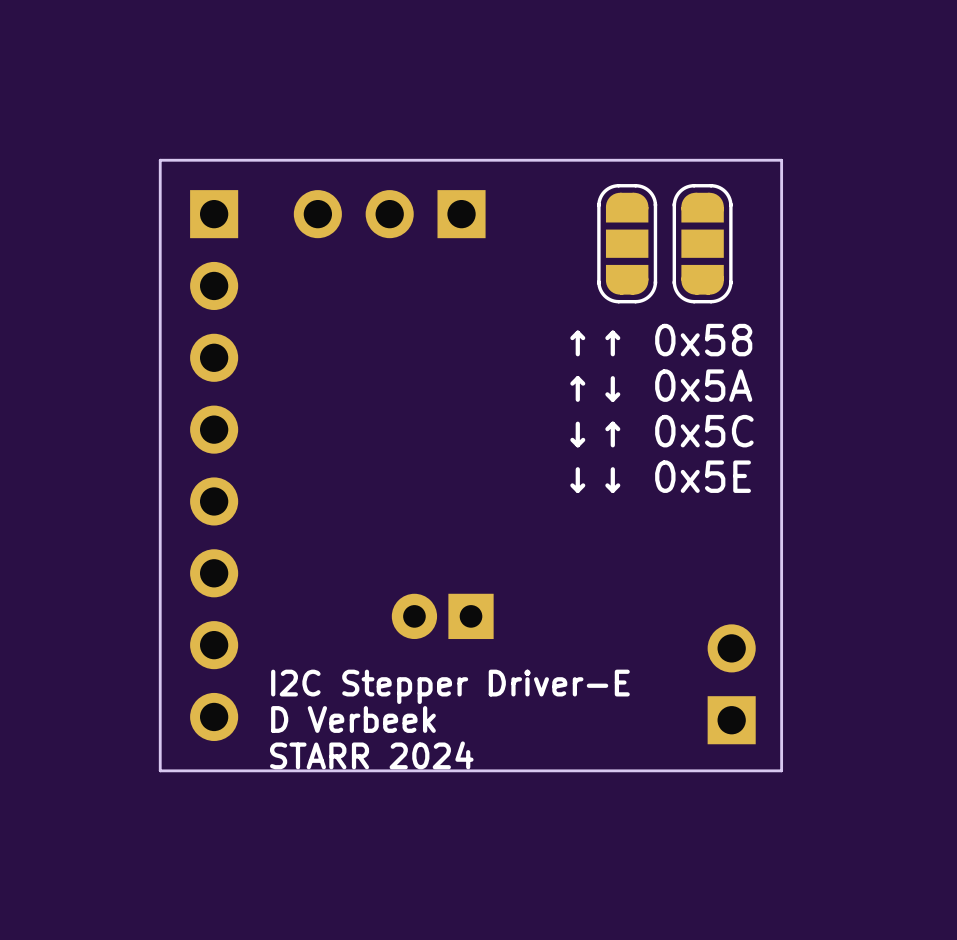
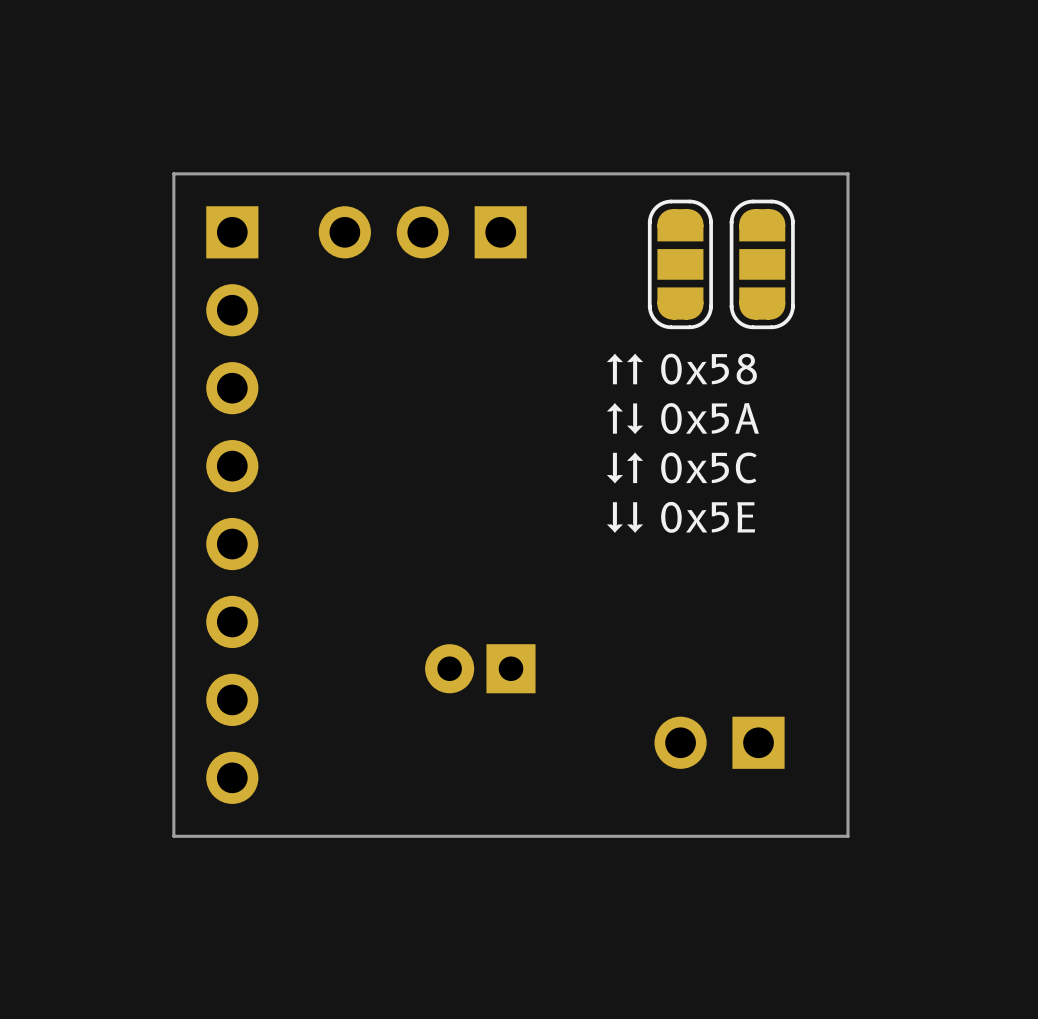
part rotation: 0° (731, 684) -> 90° counterclockwise (719, 742)
text: I2C Stepper Driver-E (450, 686) -> none
text: D Verbeek (353, 719) -> none
text: STARR 2024 (371, 755) -> none

